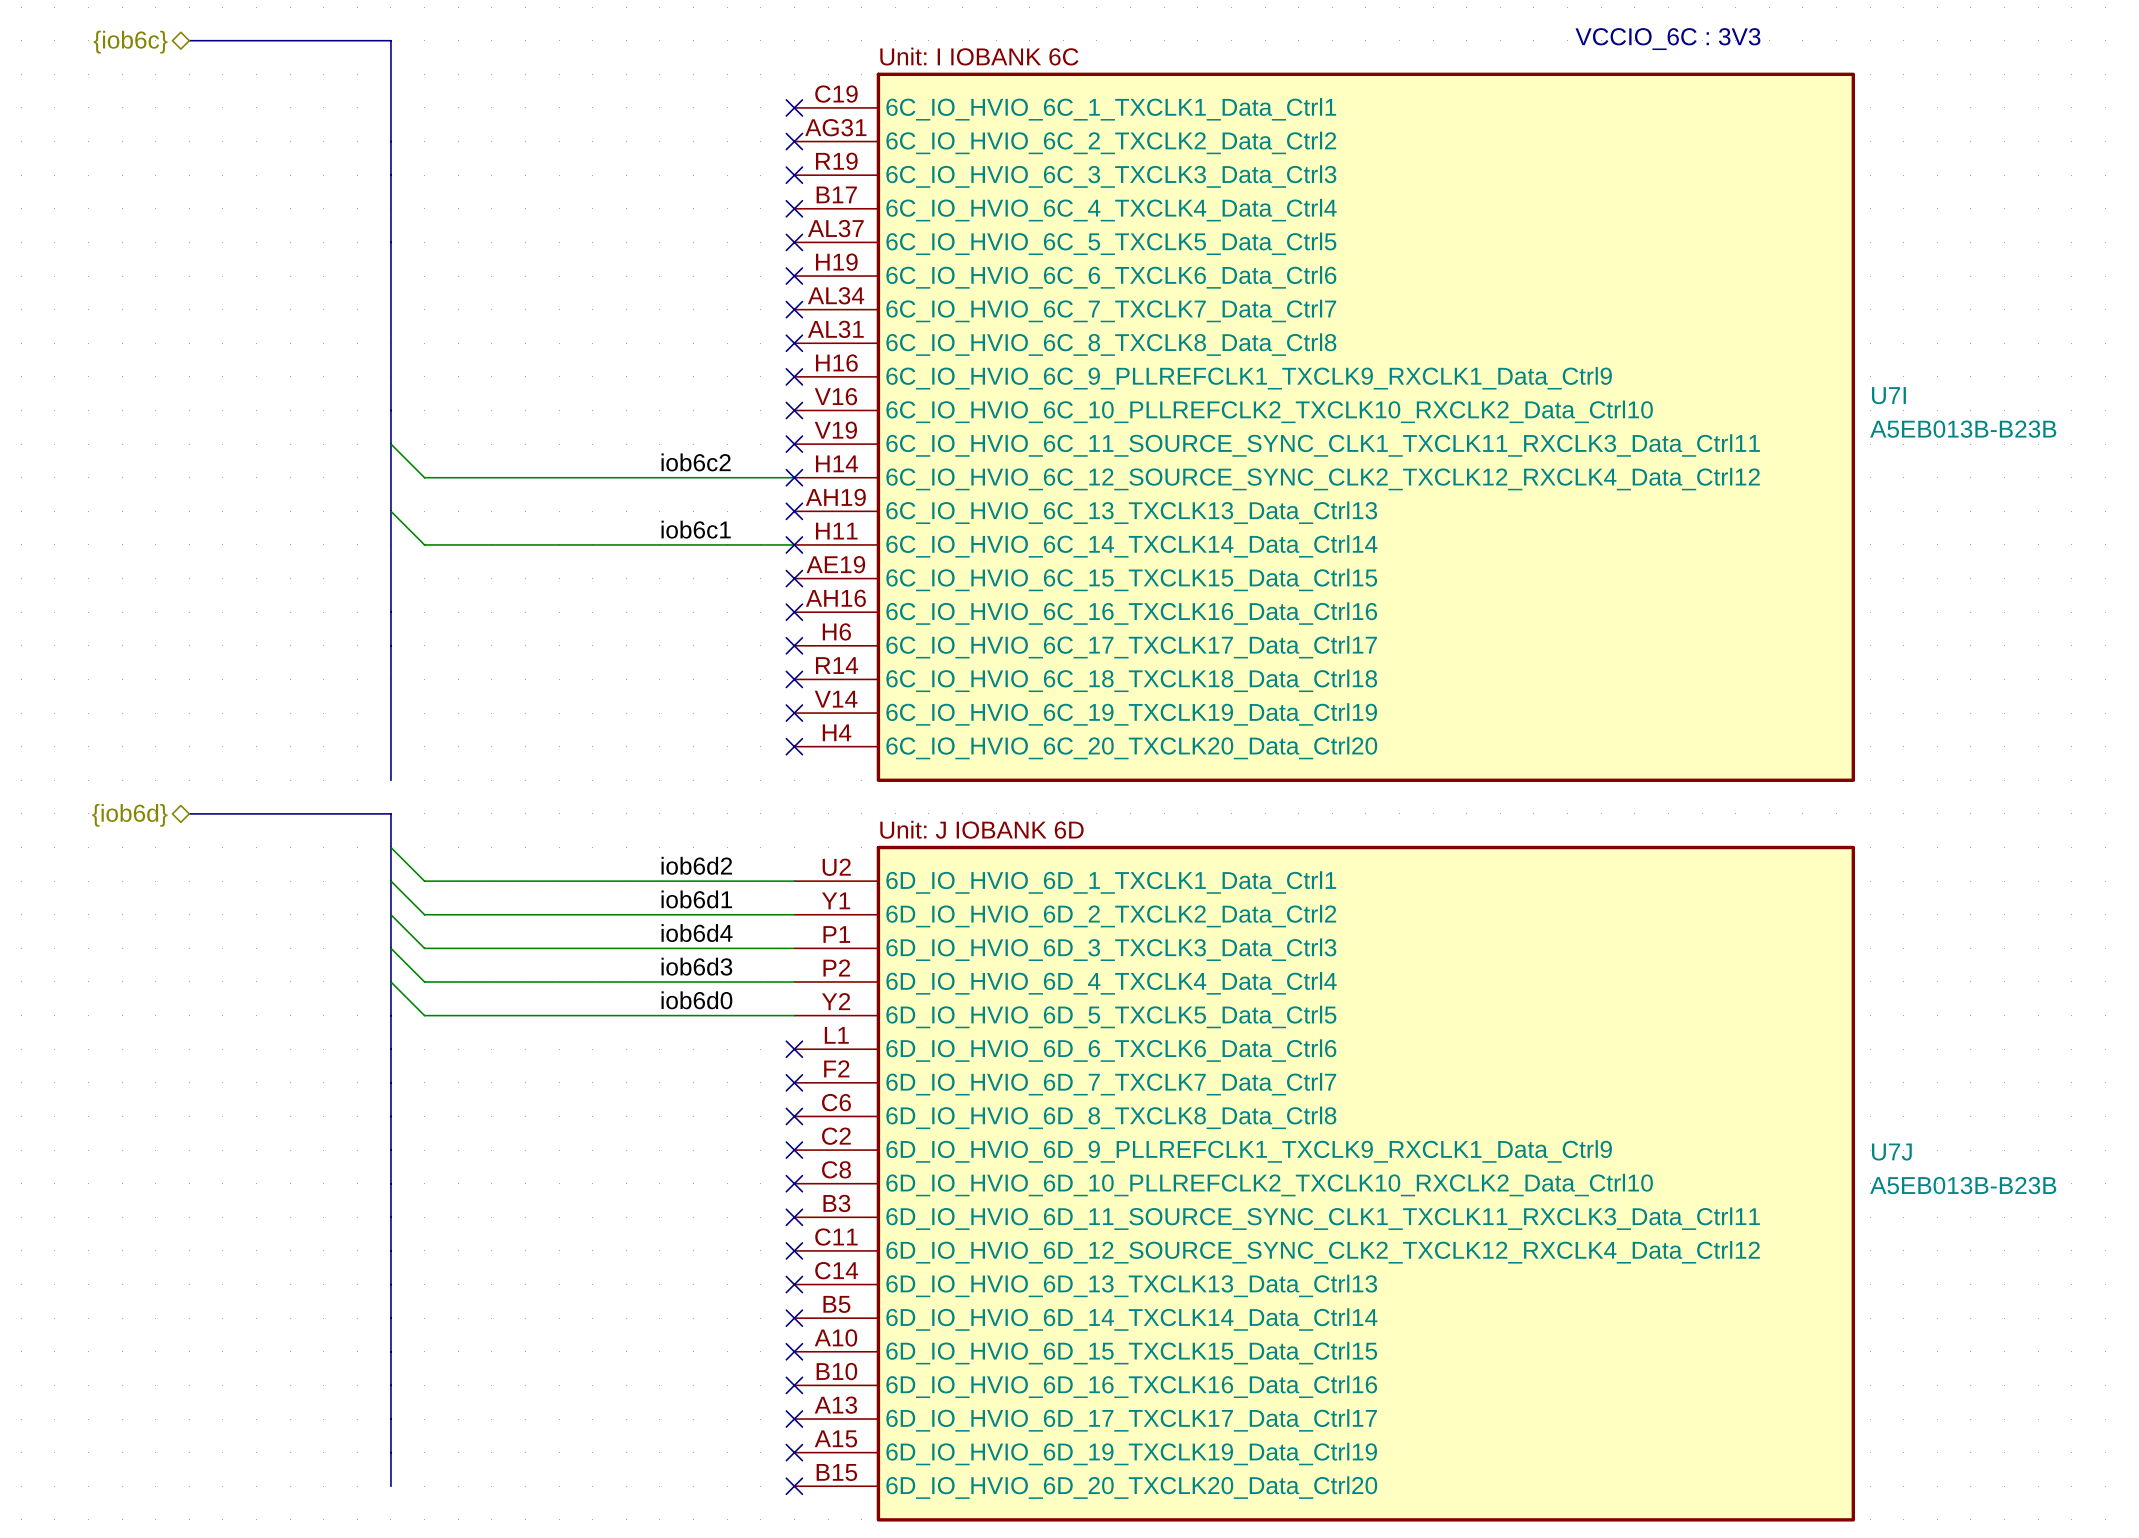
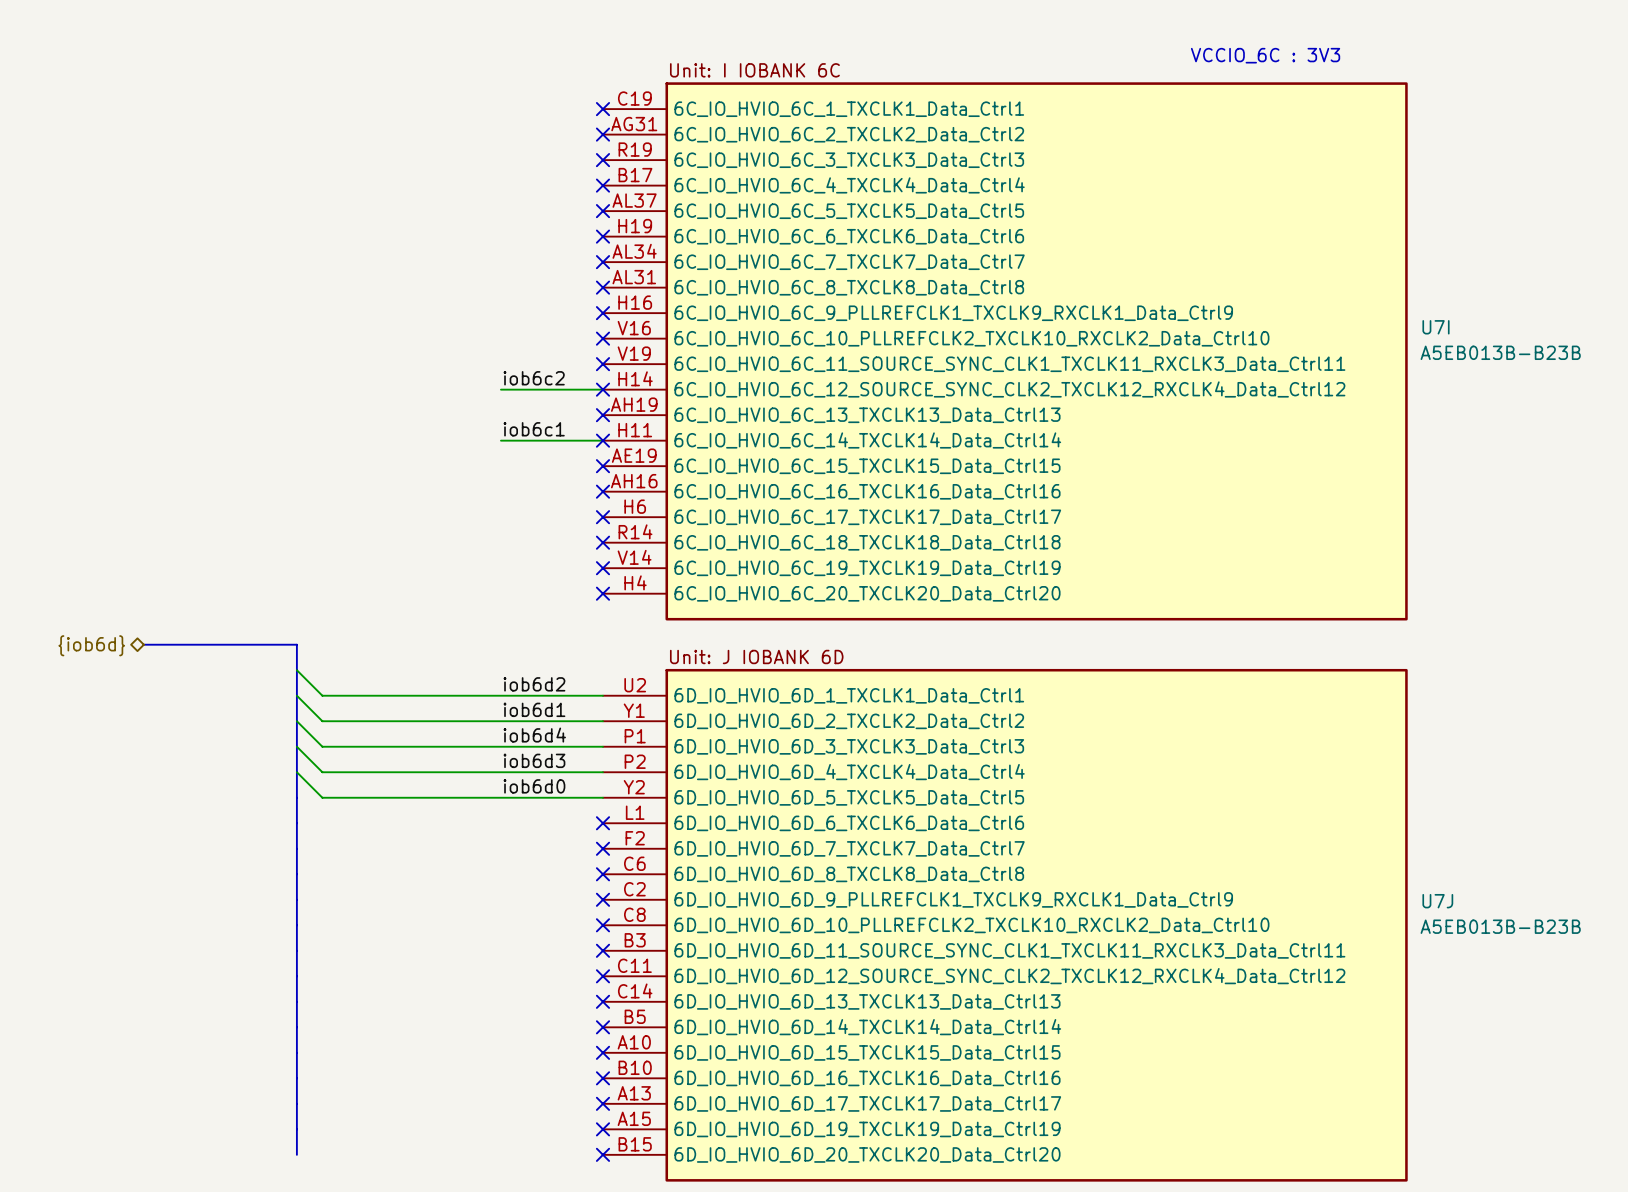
bus: (189, 40) (390, 40) (390, 780) -> none
hierarchical label: {iob6c} (130, 42) -> none
wire: (390, 444) (424, 477) (659, 477) -> none
wire: (390, 511) (424, 544) (659, 544) -> none

